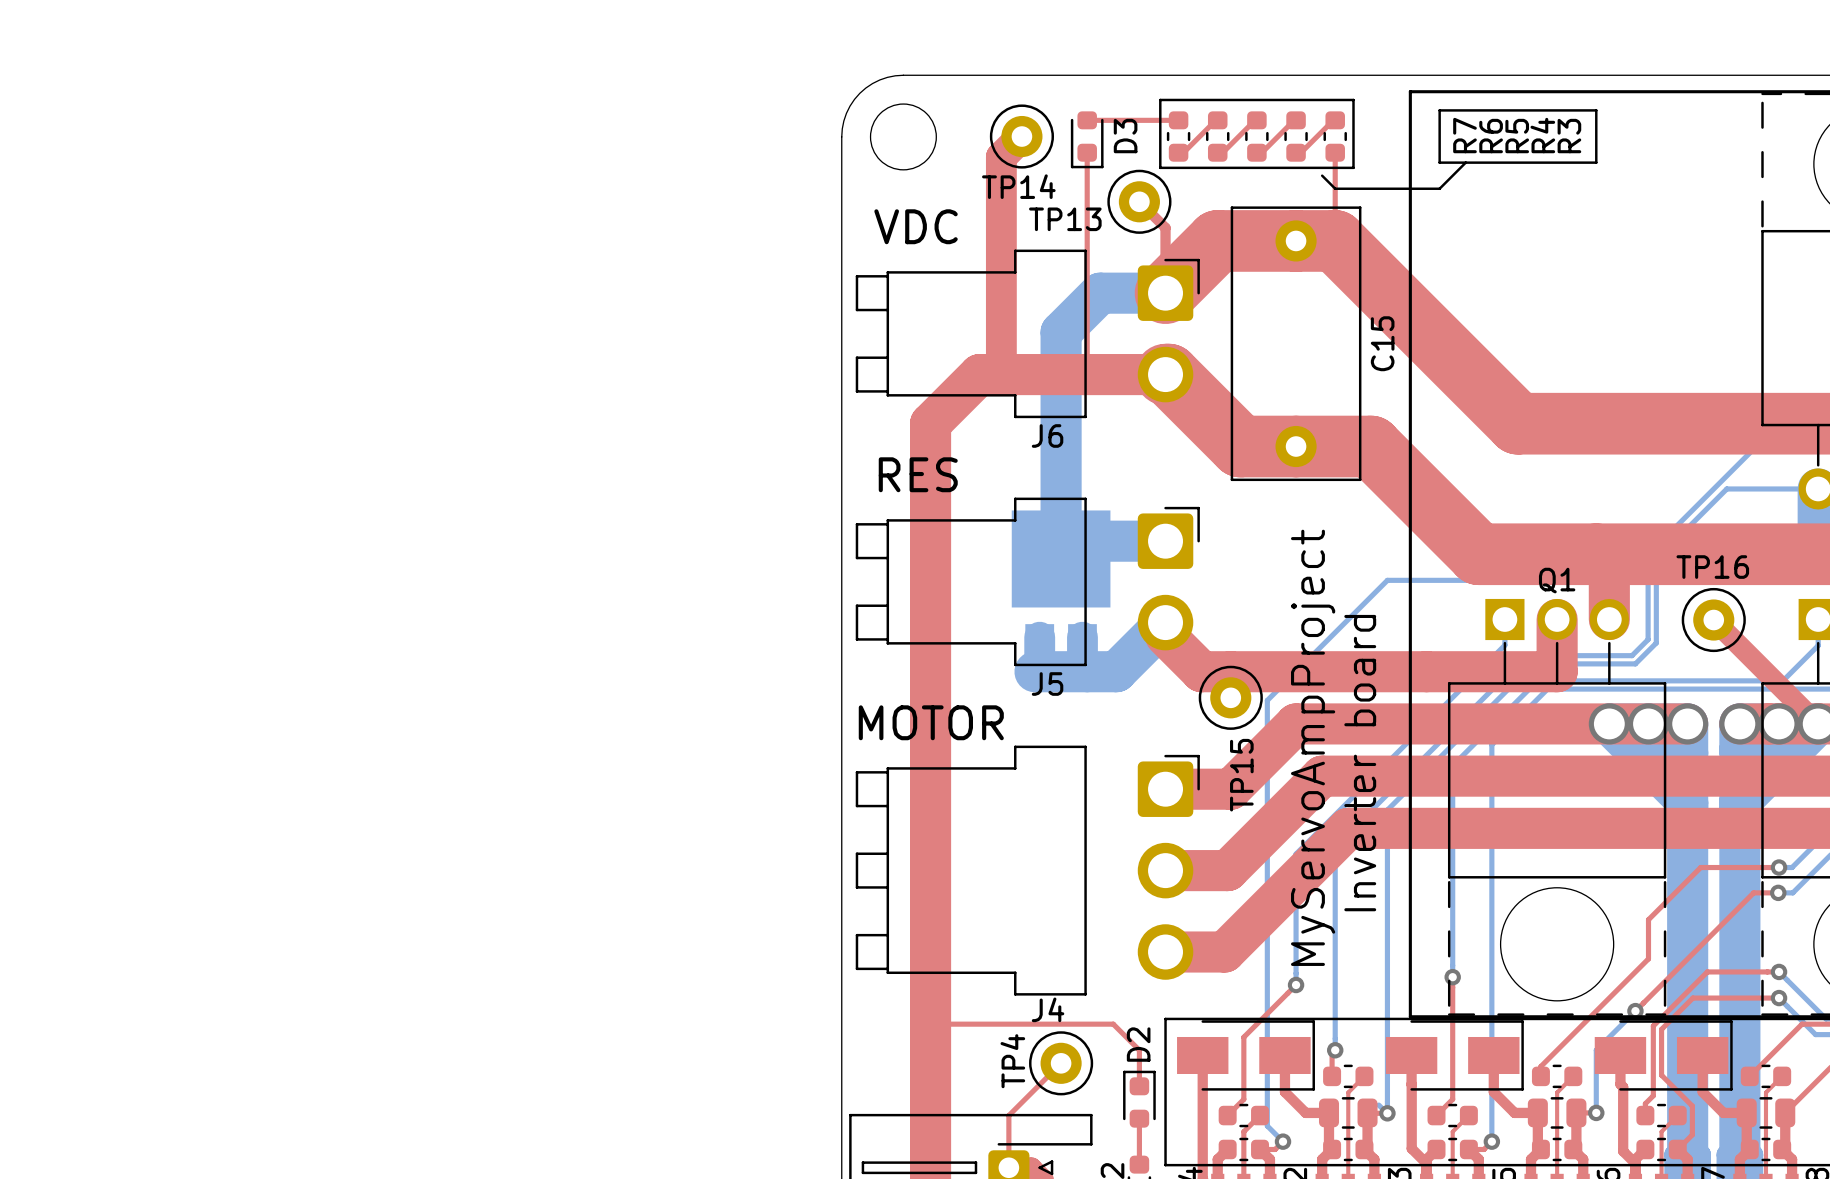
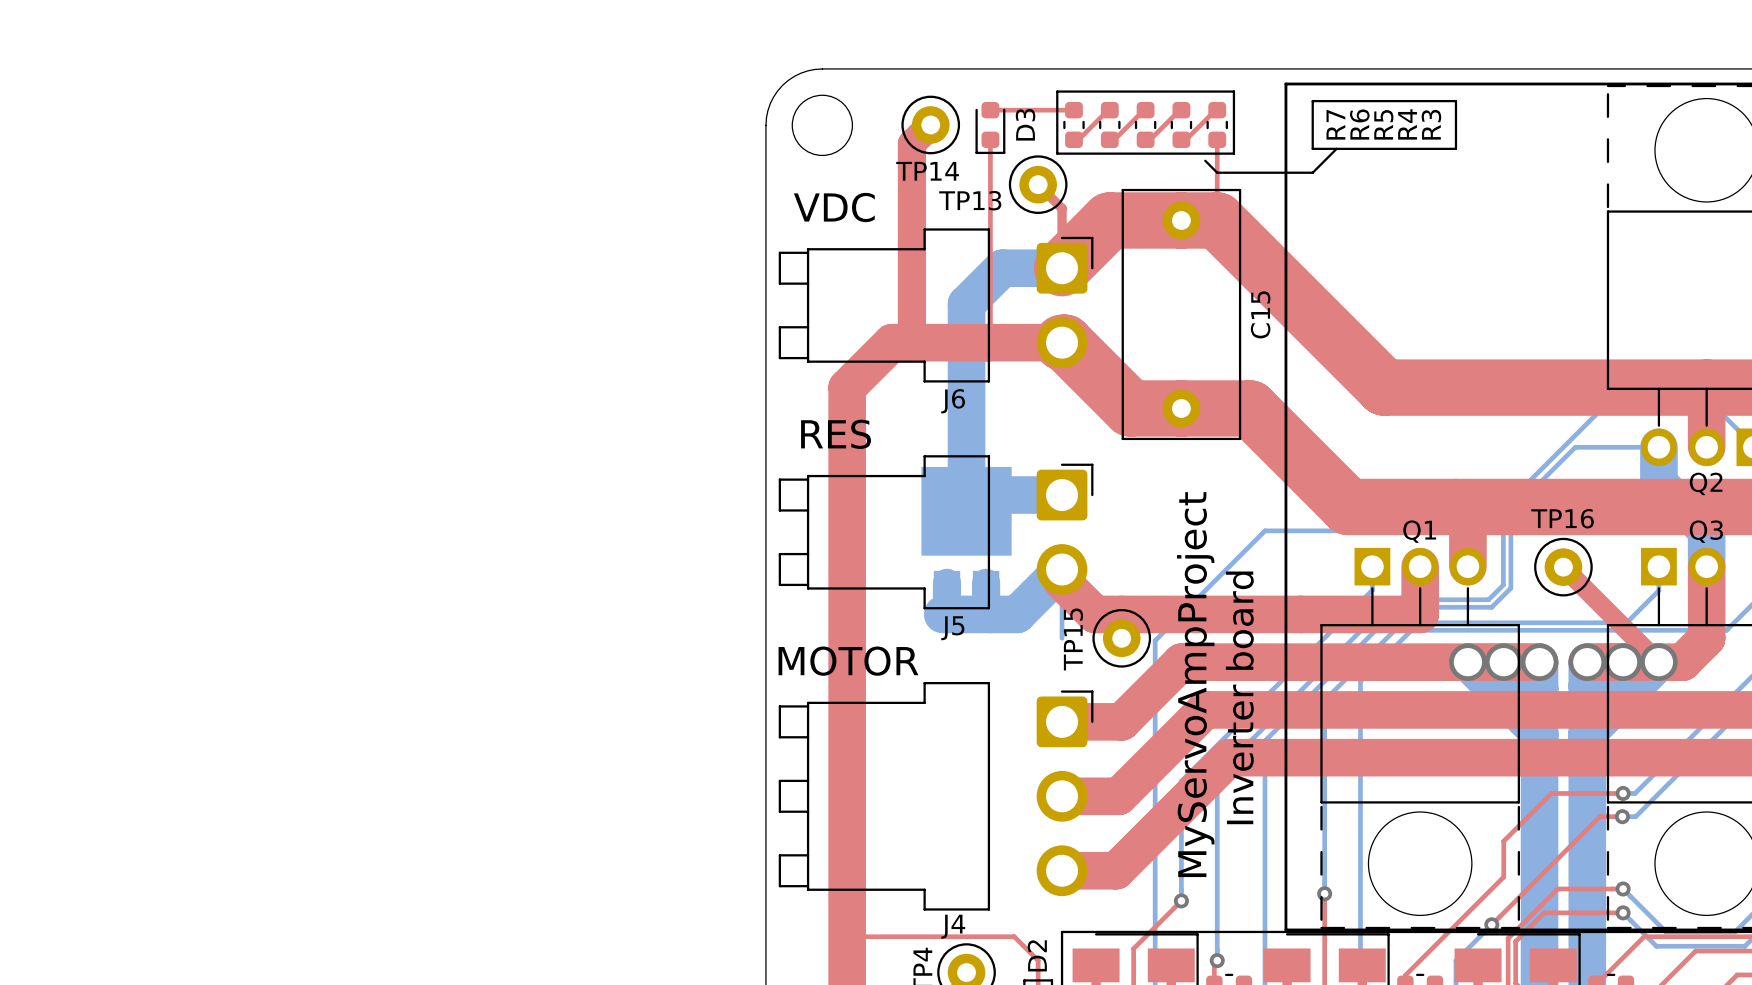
bottom track: none -> (1062, 569) (1062, 638)
TP15 name position: TP15 (1241, 775) -> TP15 (1073, 639)

